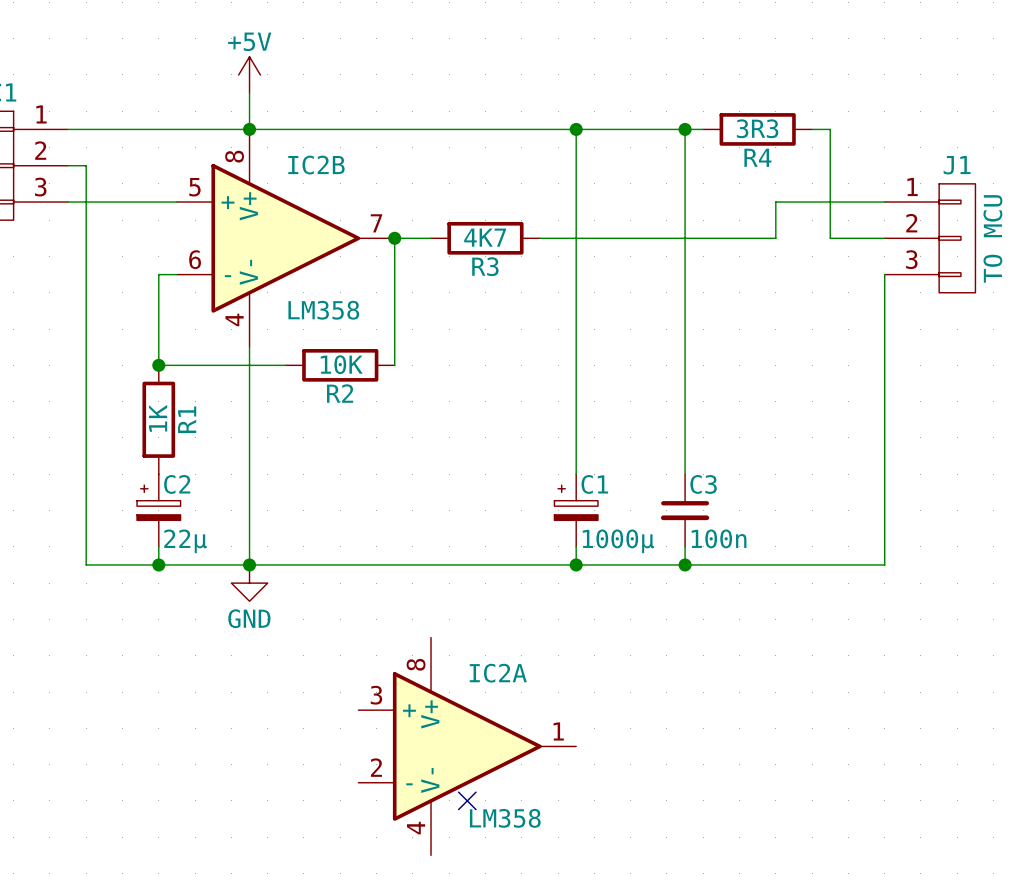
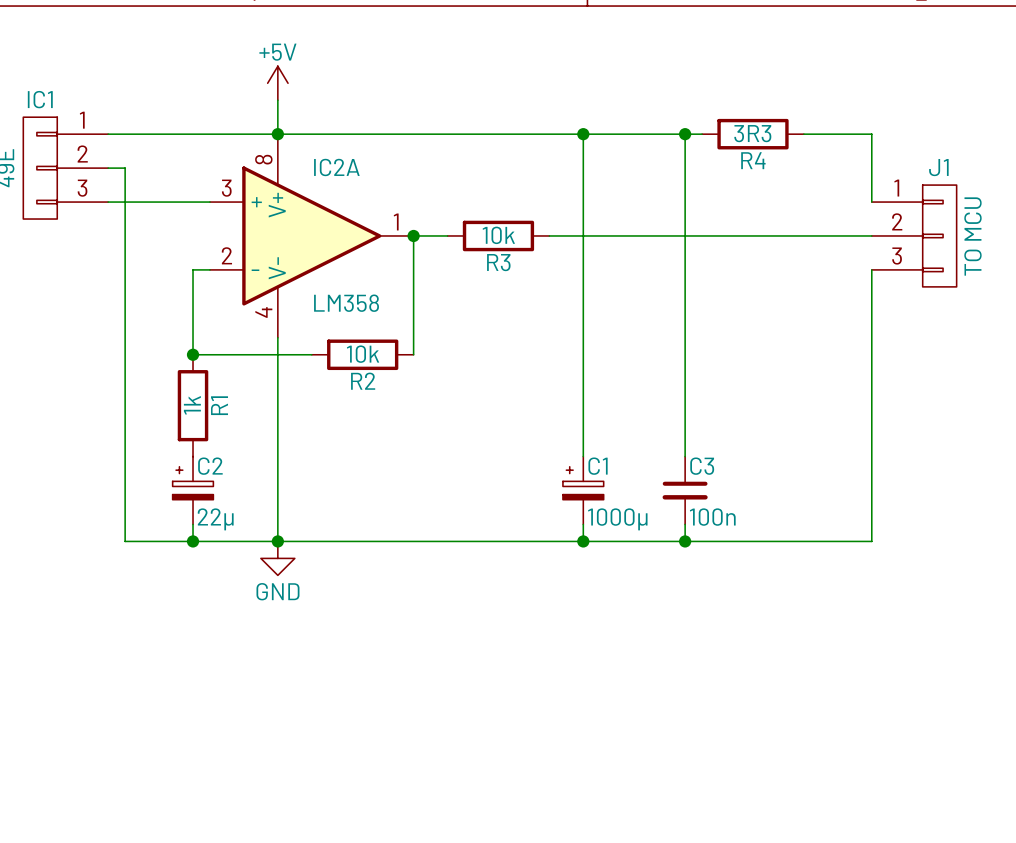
wire: (830, 129) (830, 238) -> (820, 134) (871, 134) (871, 202)
wire: (884, 202) (775, 202) (775, 238) -> (820, 235) (769, 235)
R3 value: 4K7 (485, 237) -> 10k (498, 235)
IC2B: LM358 (285, 238) -> none
R2 value: 10K (341, 364) -> 10k (363, 354)
R1 value: 1K (158, 418) -> 1k (192, 405)
IC2A position: (467, 746) -> (311, 235)
no-connect mark: (467, 800) -> none

